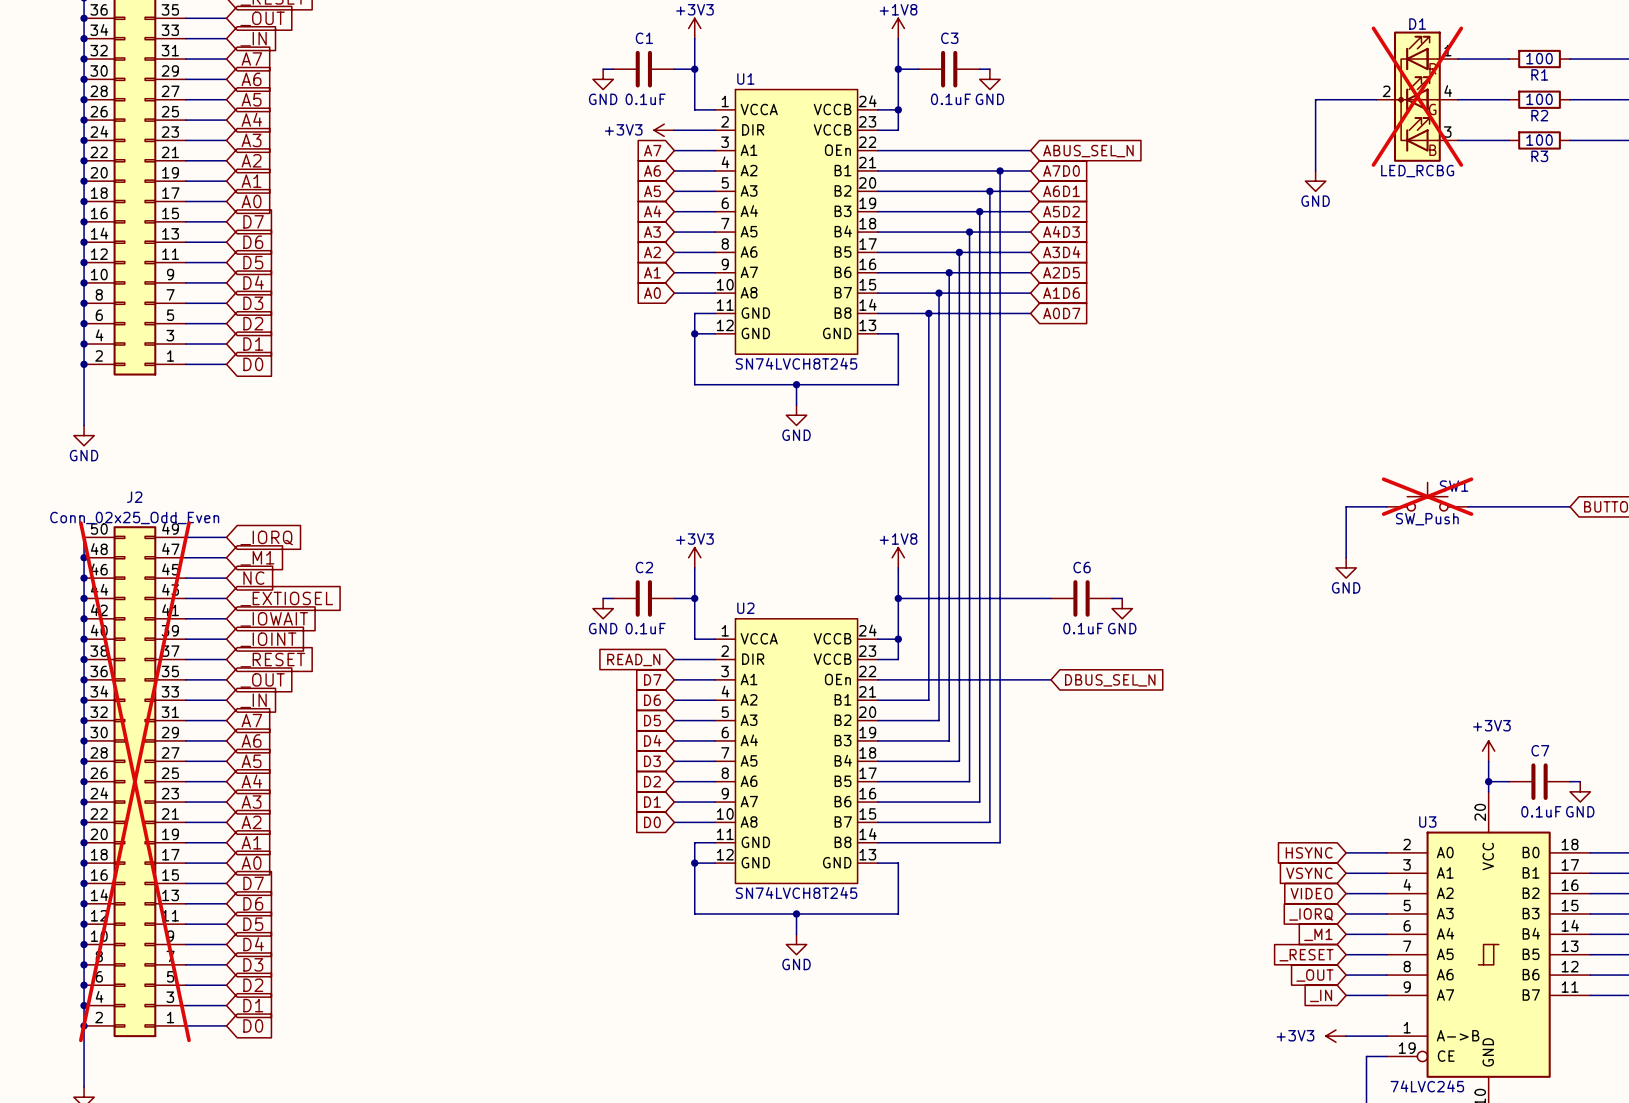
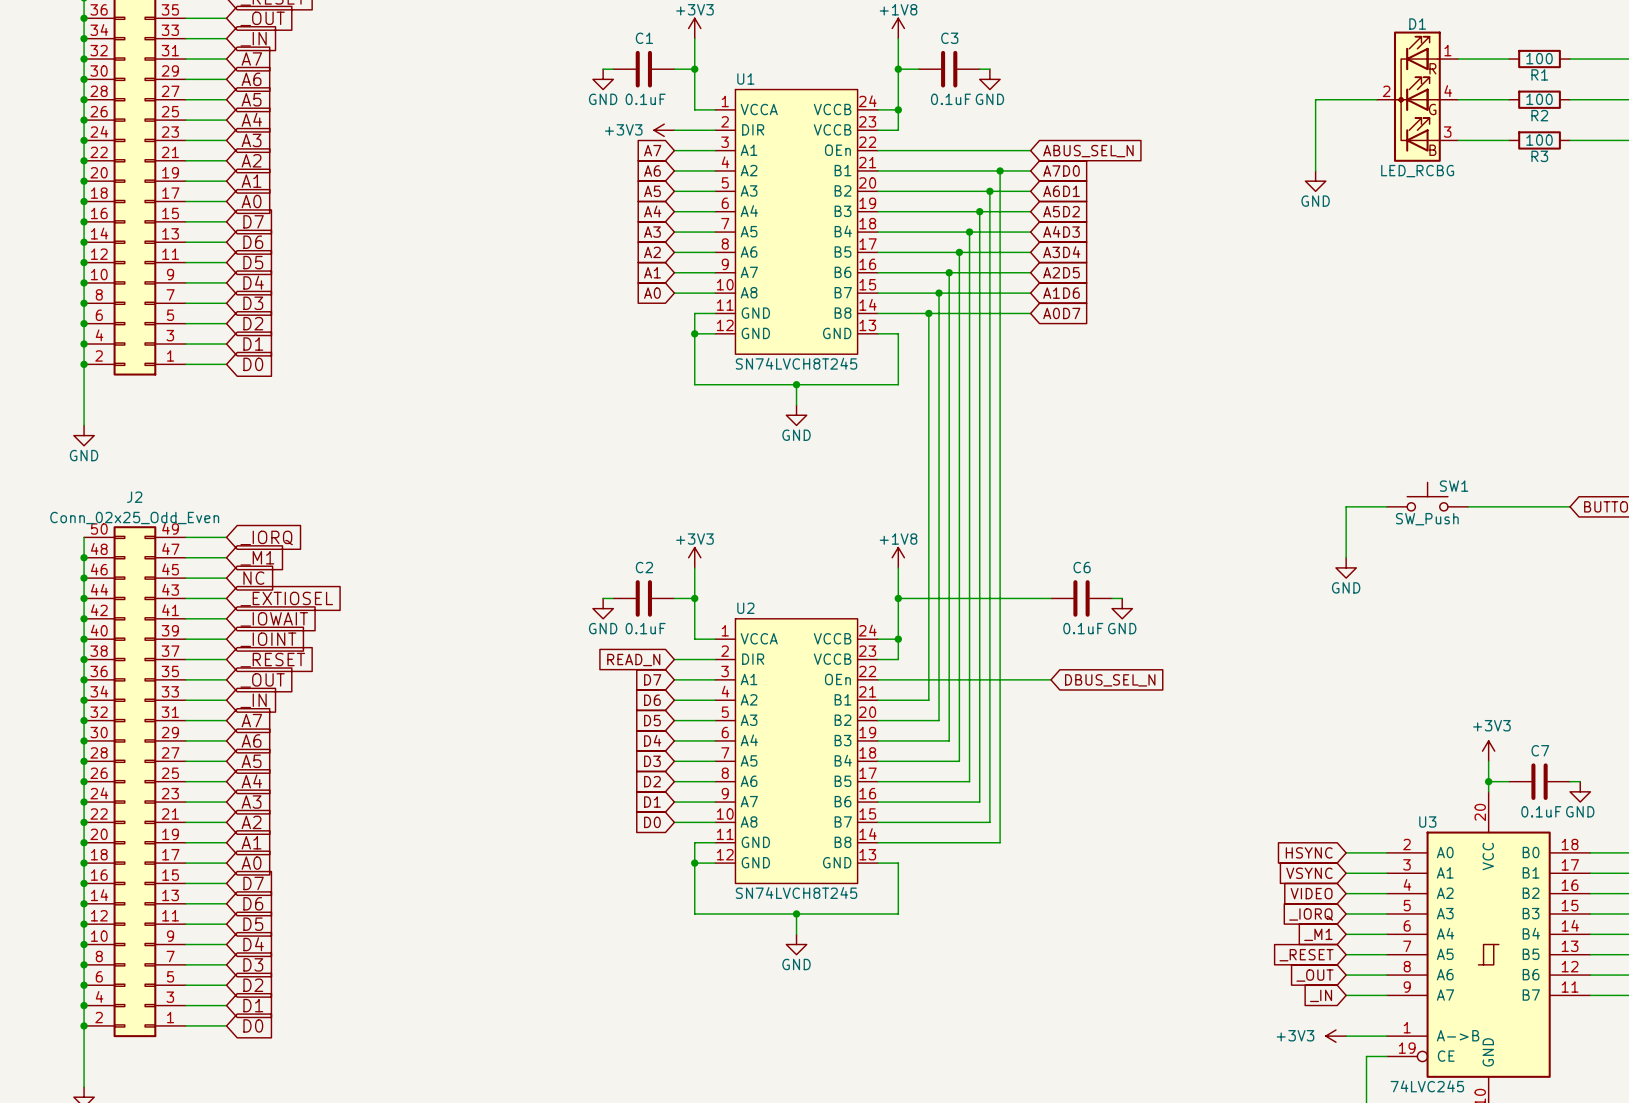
D1 do-not-place cross: (1417, 96) -> none
SW1 do-not-place cross: (1427, 496) -> none
J2 do-not-place cross: (134, 781) -> none

